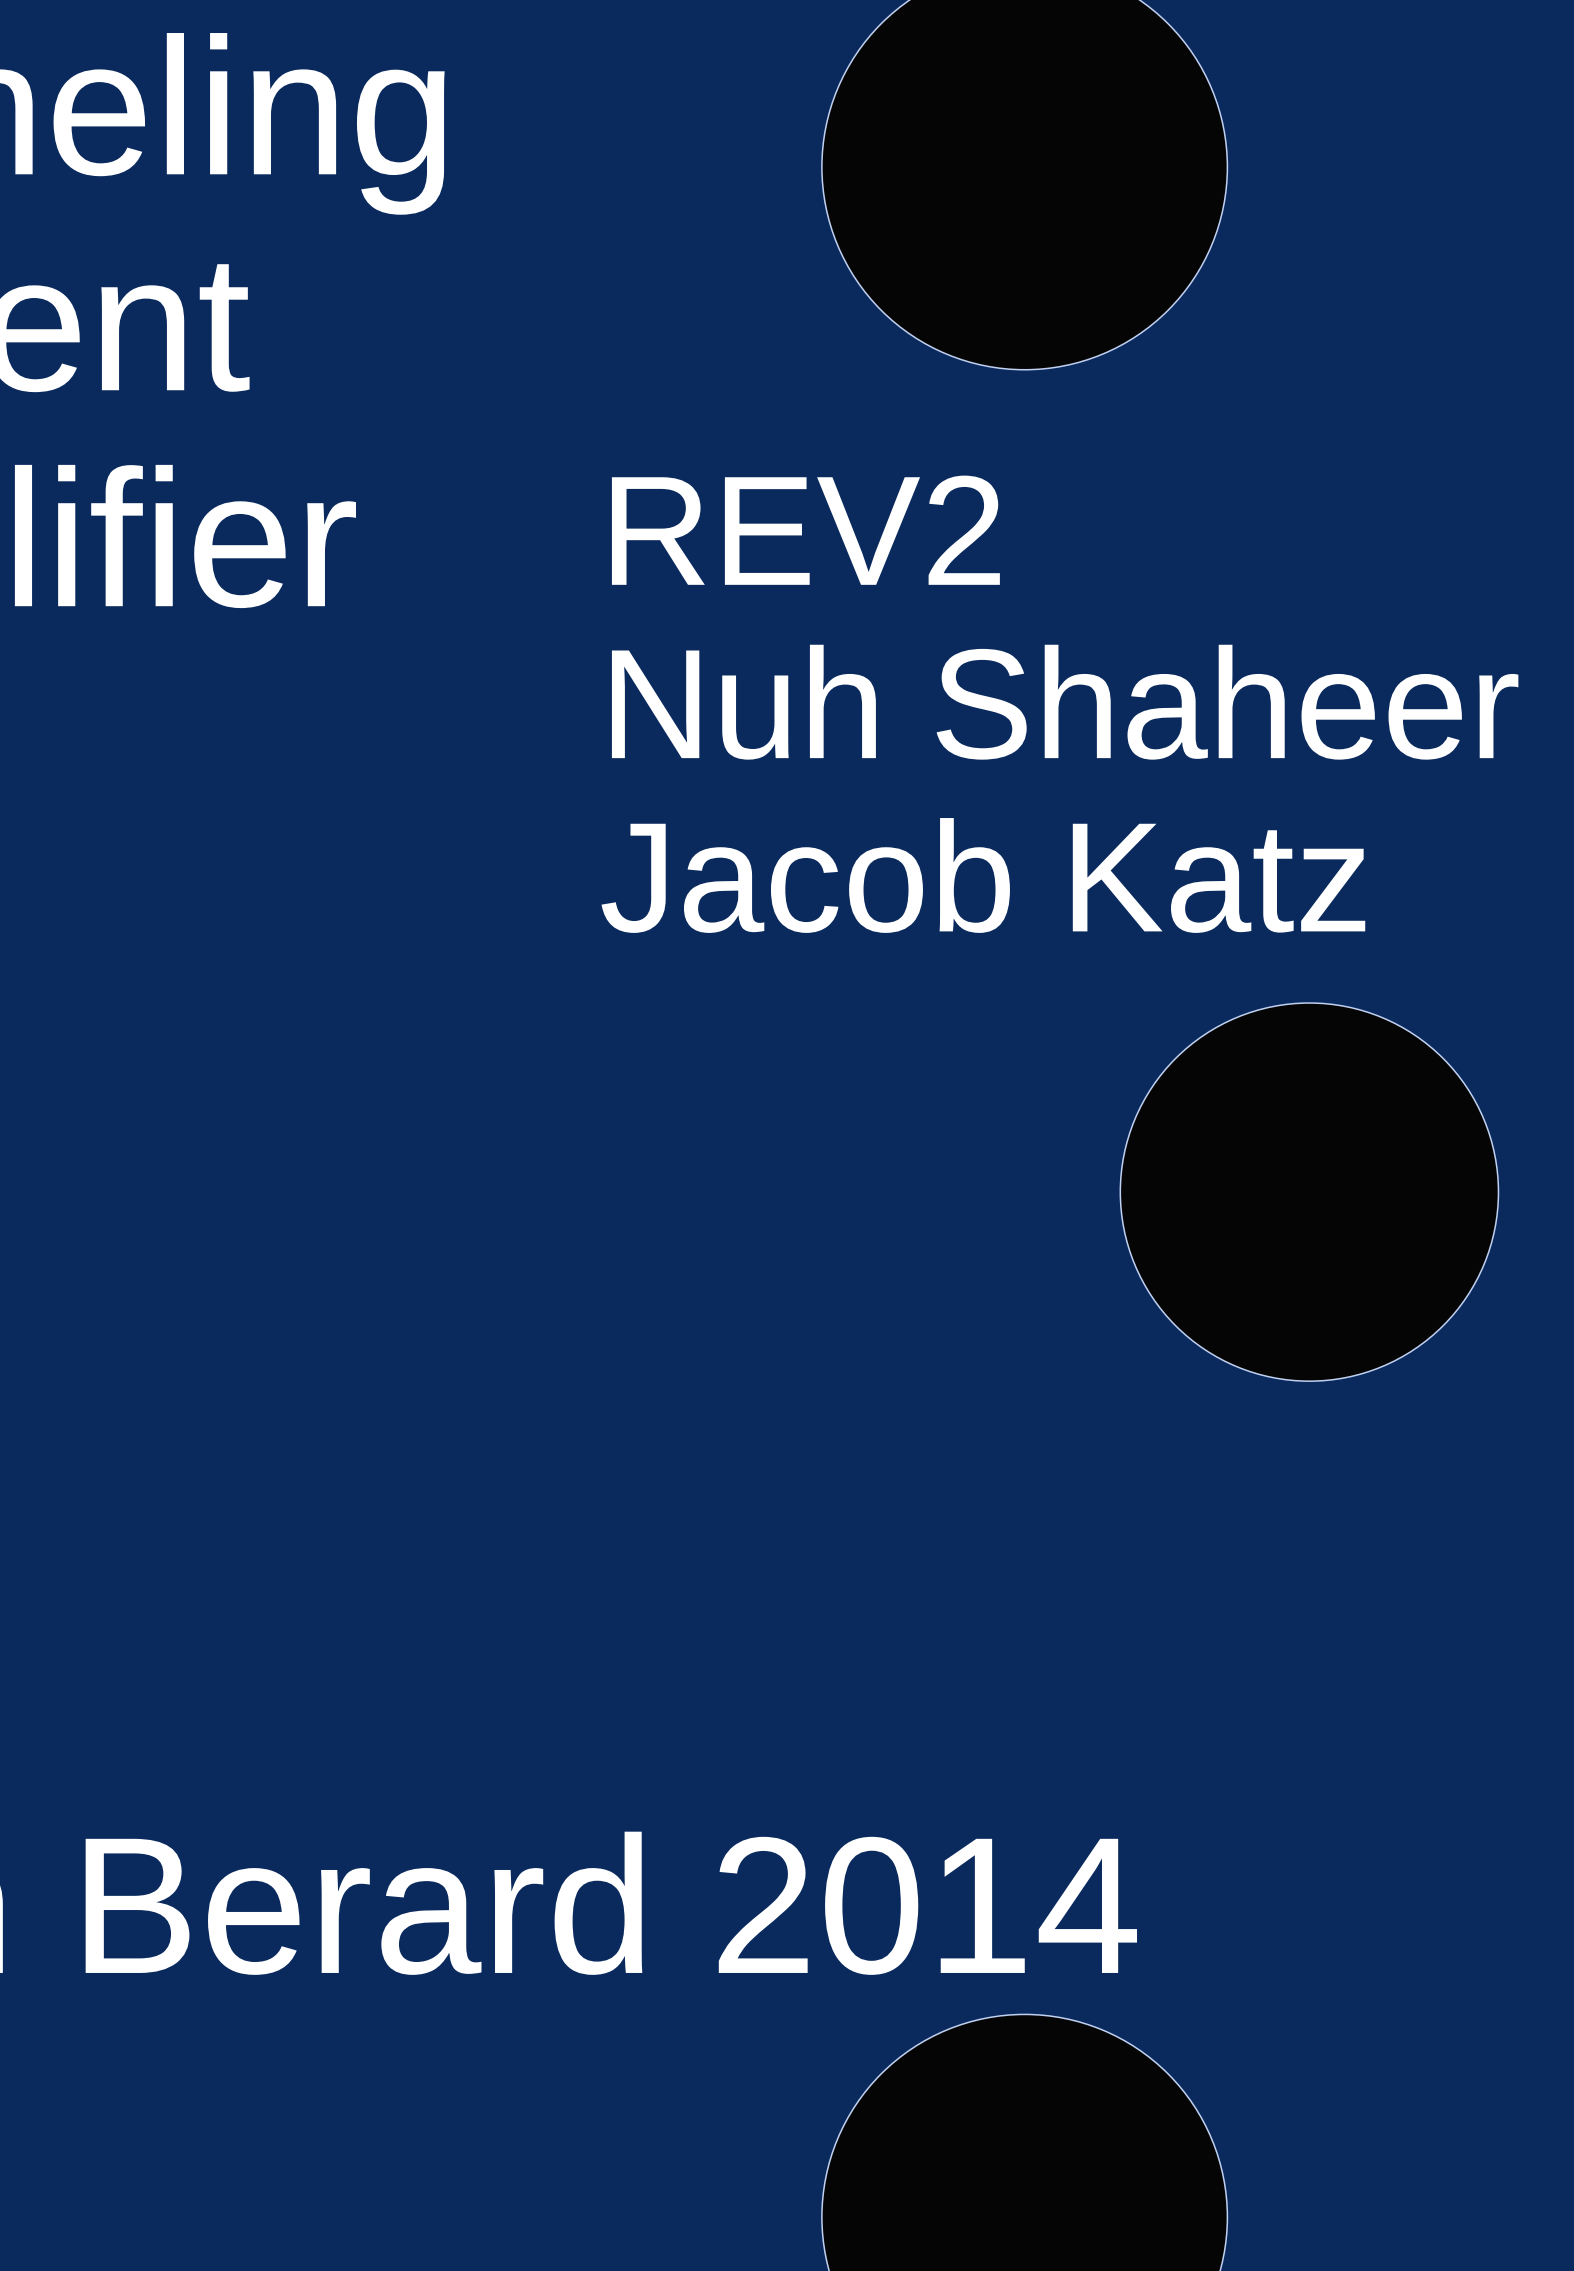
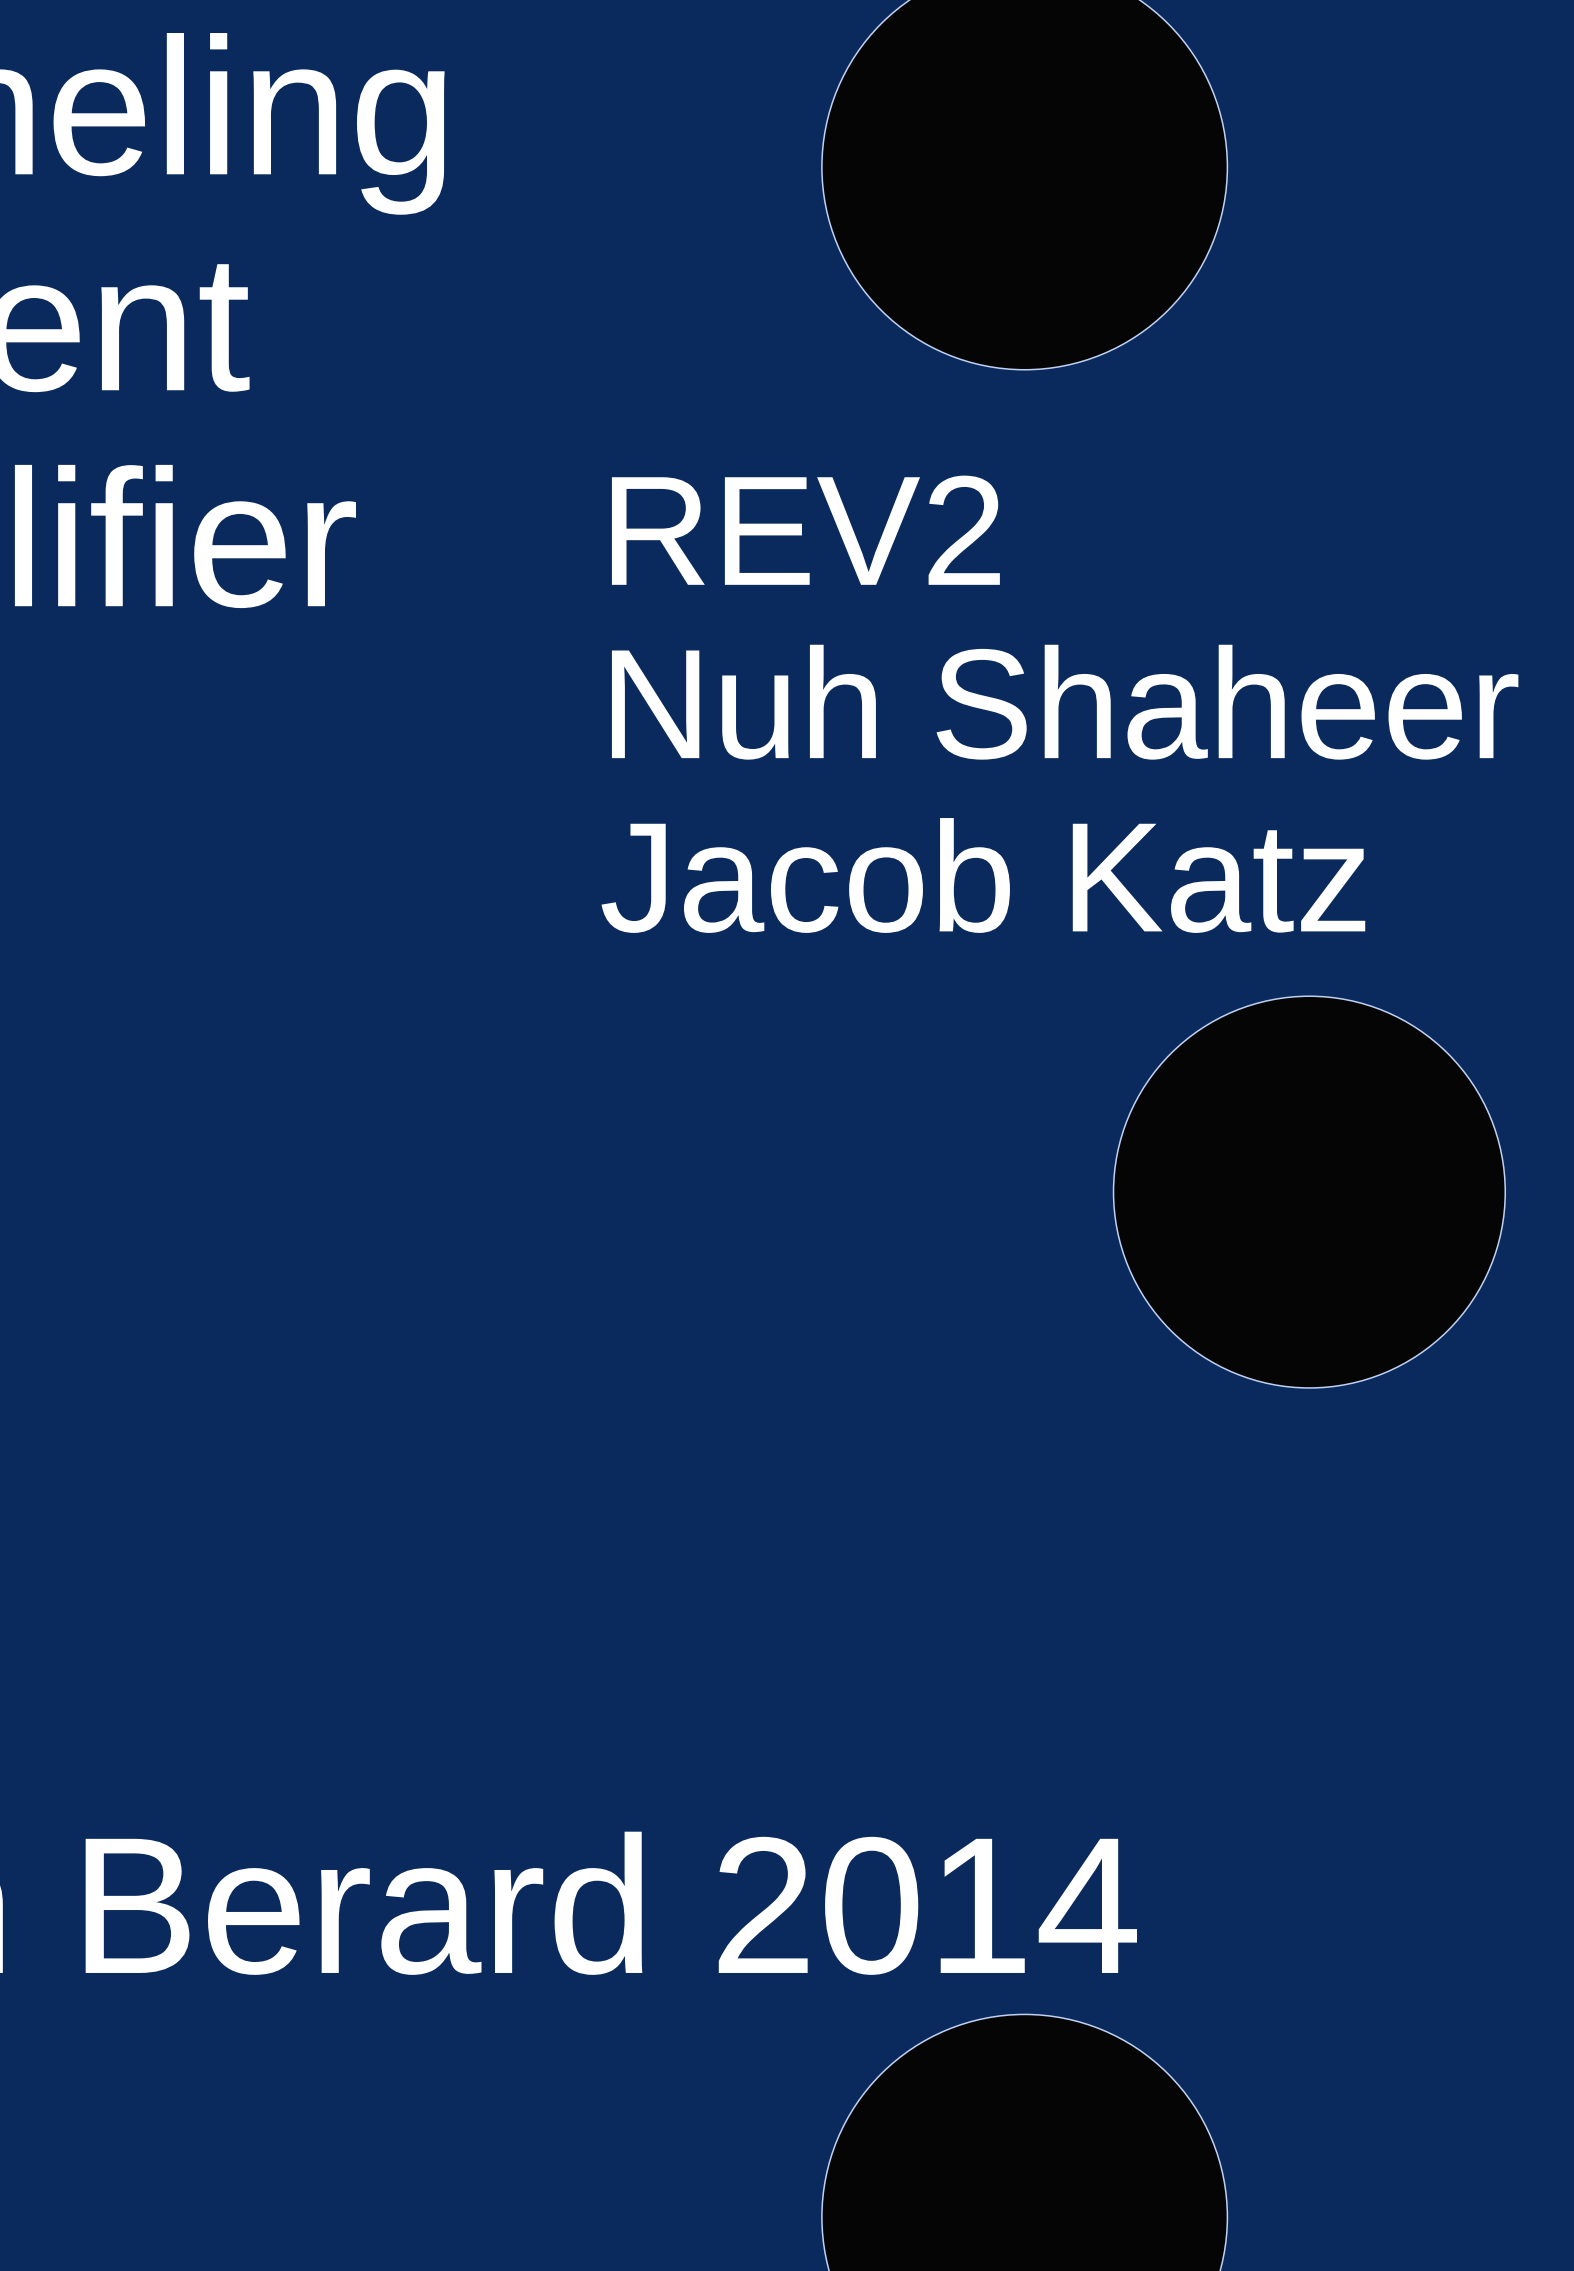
part footprint: [1120, 1003, 1499, 1382] -> [1113, 996, 1506, 1388]

